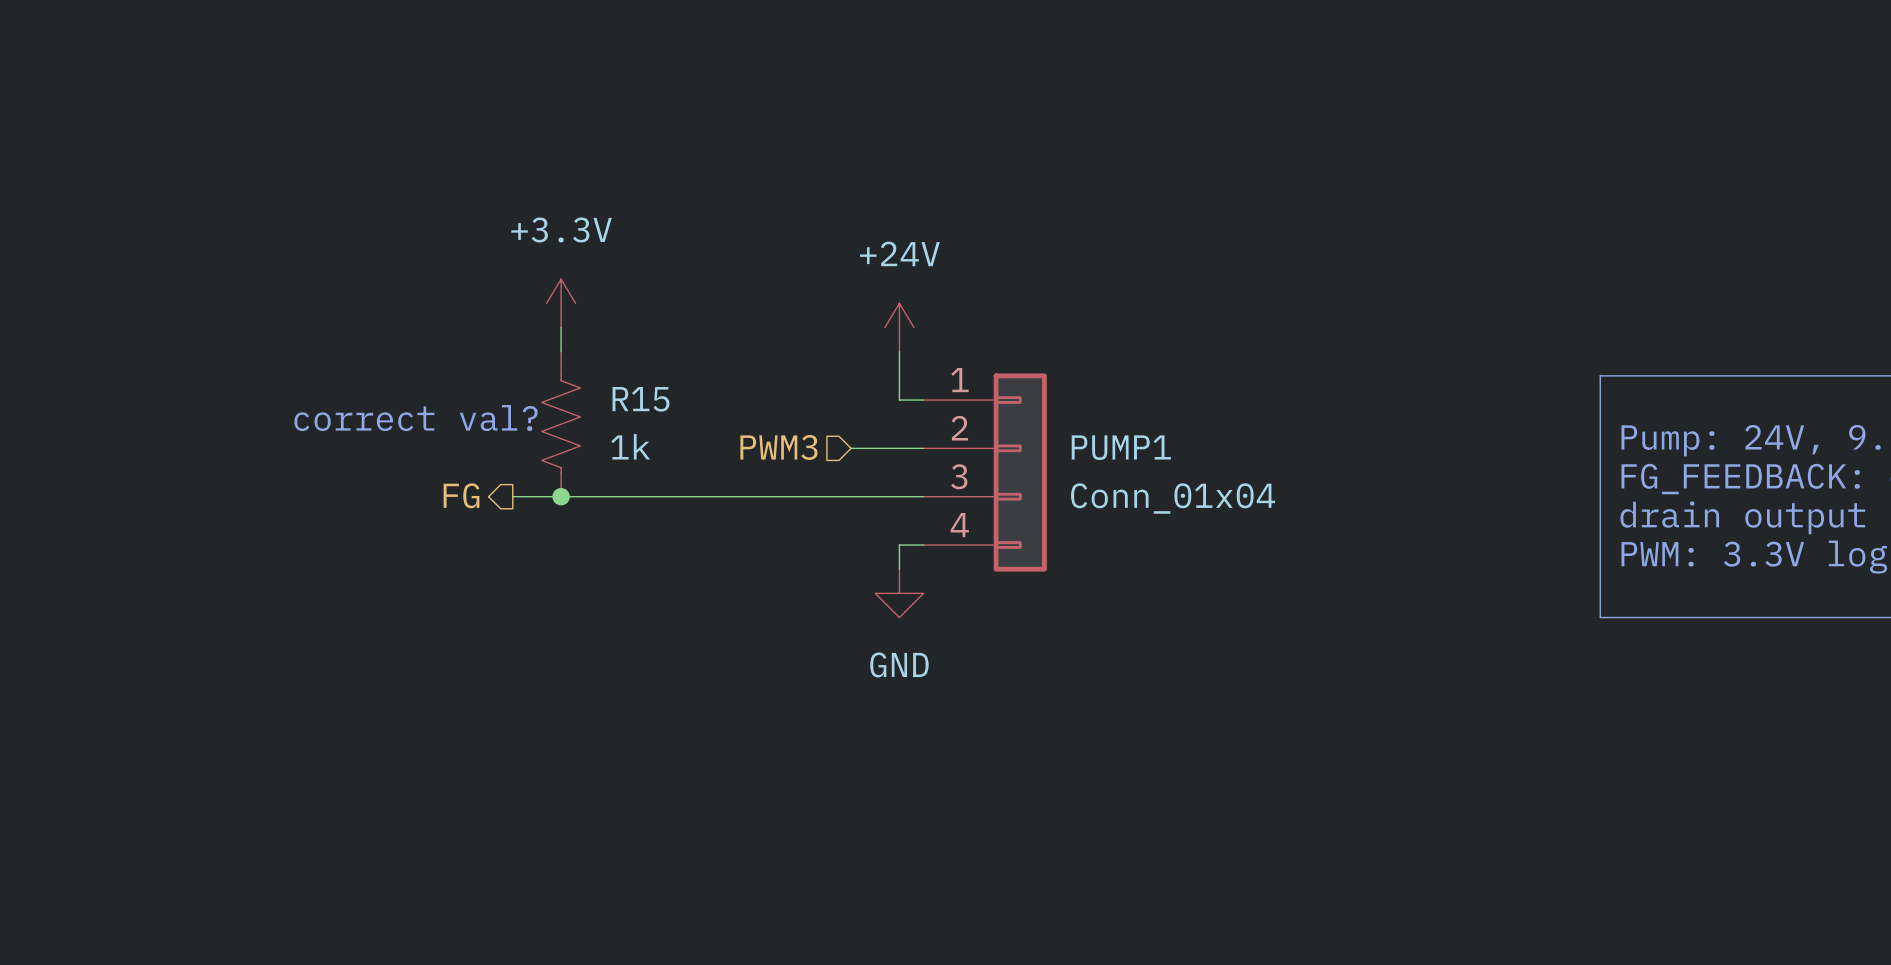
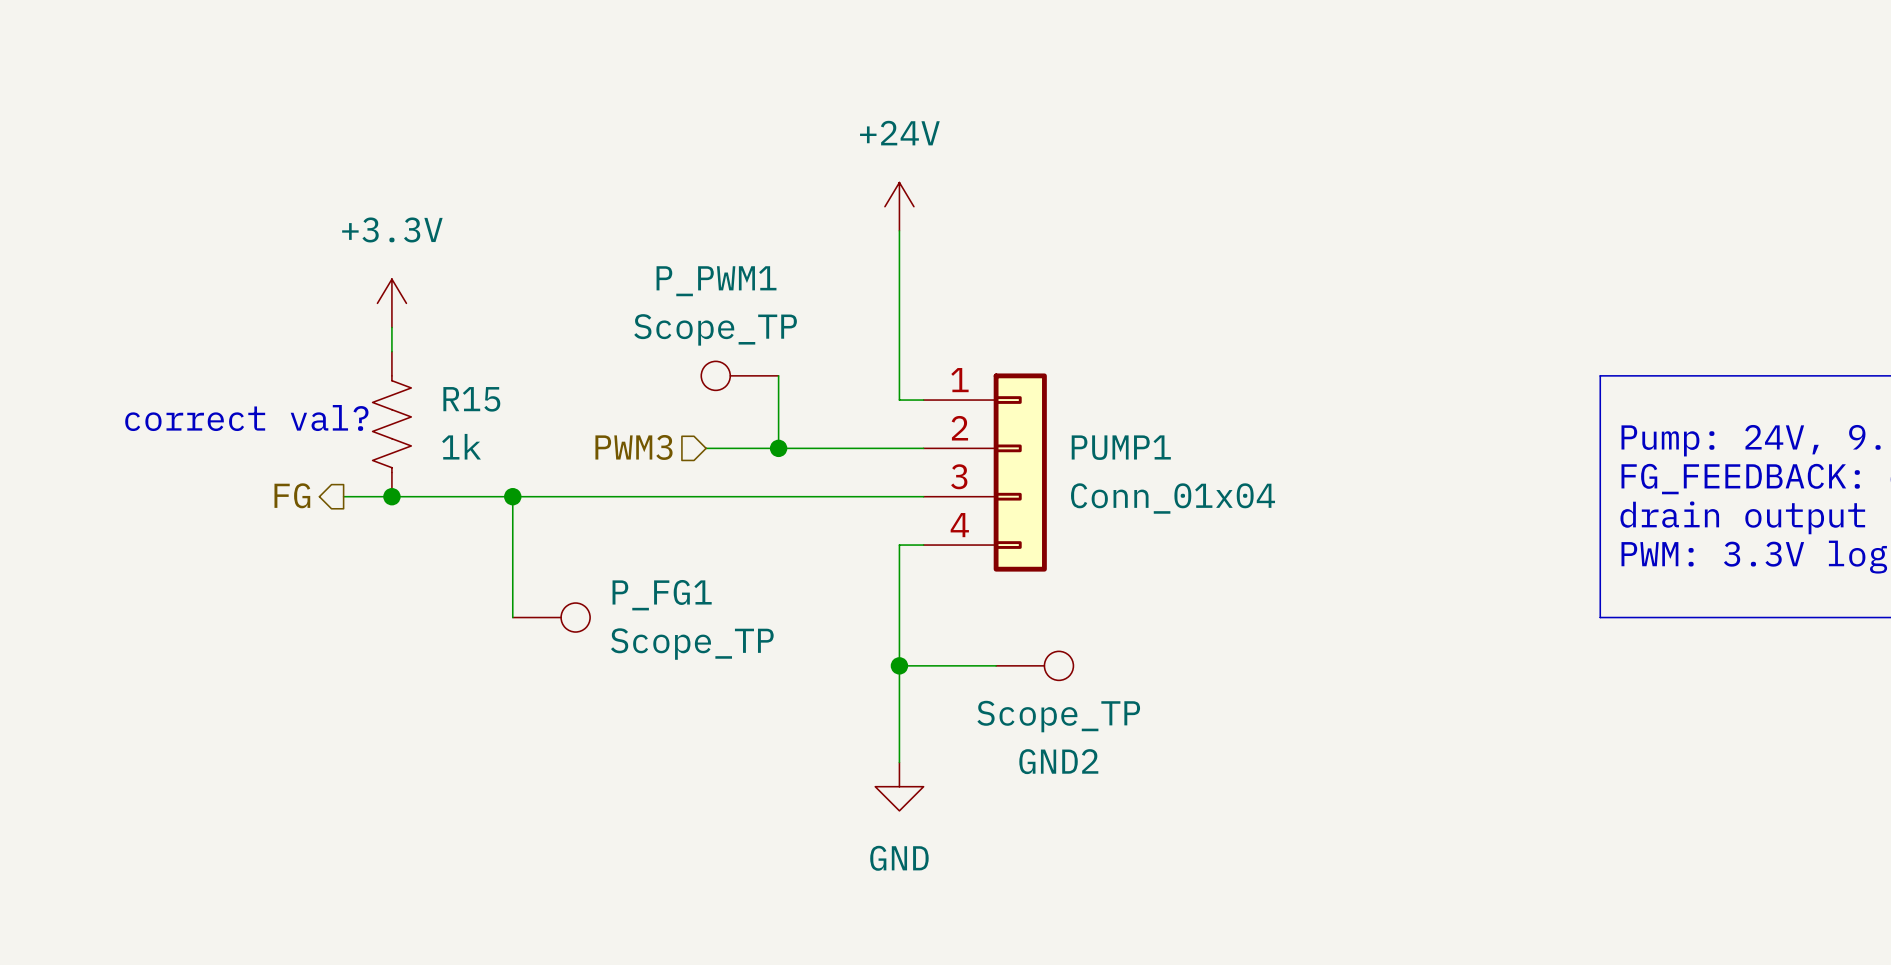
wire: none -> (899, 230) (899, 351)
power symbol position: +3.3V (561, 303) -> +3.3V (391, 303)
wire: (561, 327) (561, 351) -> (391, 327) (391, 351)
power symbol position: +24V (899, 327) -> +24V (899, 206)
P_PWM1: none -> Scope_TP (739, 375)
wire: none -> (778, 375) (778, 448)
text position: correct val? (416, 418) -> correct val? (246, 418)
R15 position: (561, 424) -> (391, 424)
hierarchical label position: PWM3 (779, 447) -> PWM3 (634, 447)
wire: none -> (706, 448) (851, 448)
junction: none -> (778, 448)
hierarchical label position: FG (461, 495) -> FG (292, 495)
wire: none -> (343, 496) (512, 496) (512, 617)
junction: none -> (391, 496)
junction position: (561, 496) -> (512, 496)
wire: none -> (899, 569) (899, 762)
power symbol position: GND (899, 593) -> GND (899, 786)
P_FG1: none -> Scope_TP (551, 617)
wire: none -> (899, 665) (996, 665)
junction: none -> (899, 665)
GND2: none -> Scope_TP (1034, 665)

